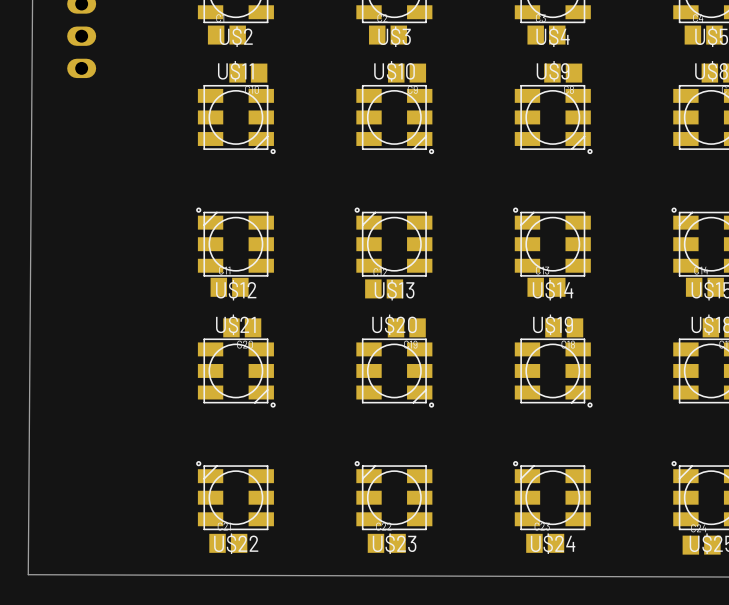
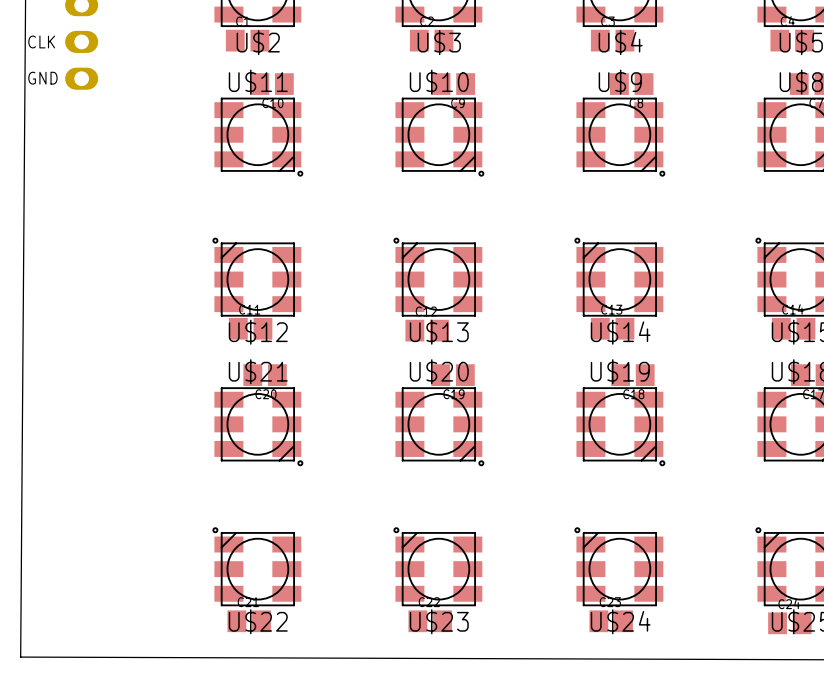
text: none -> CLK (41, 41)
text: none -> GND (42, 78)

